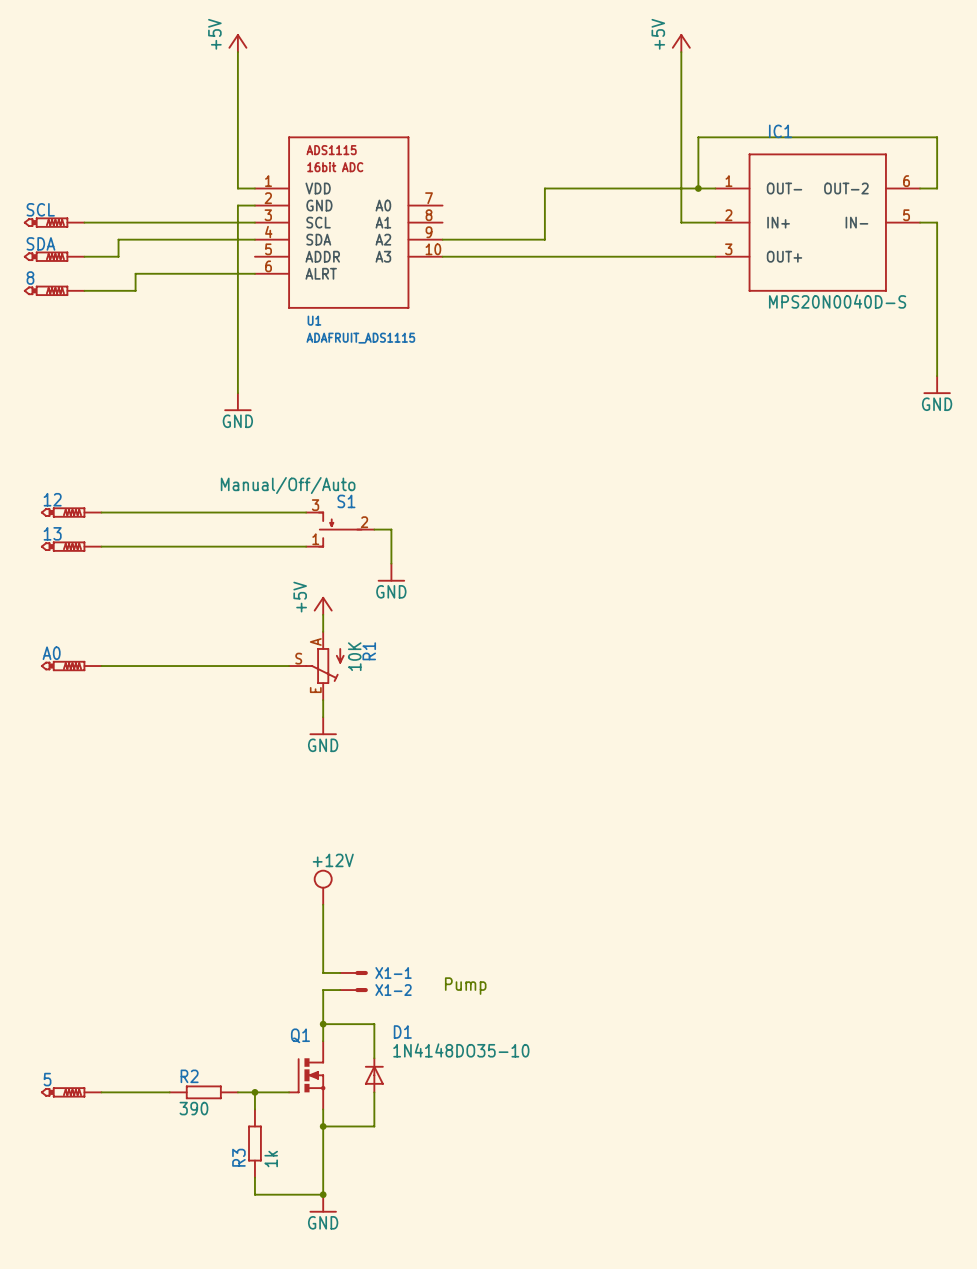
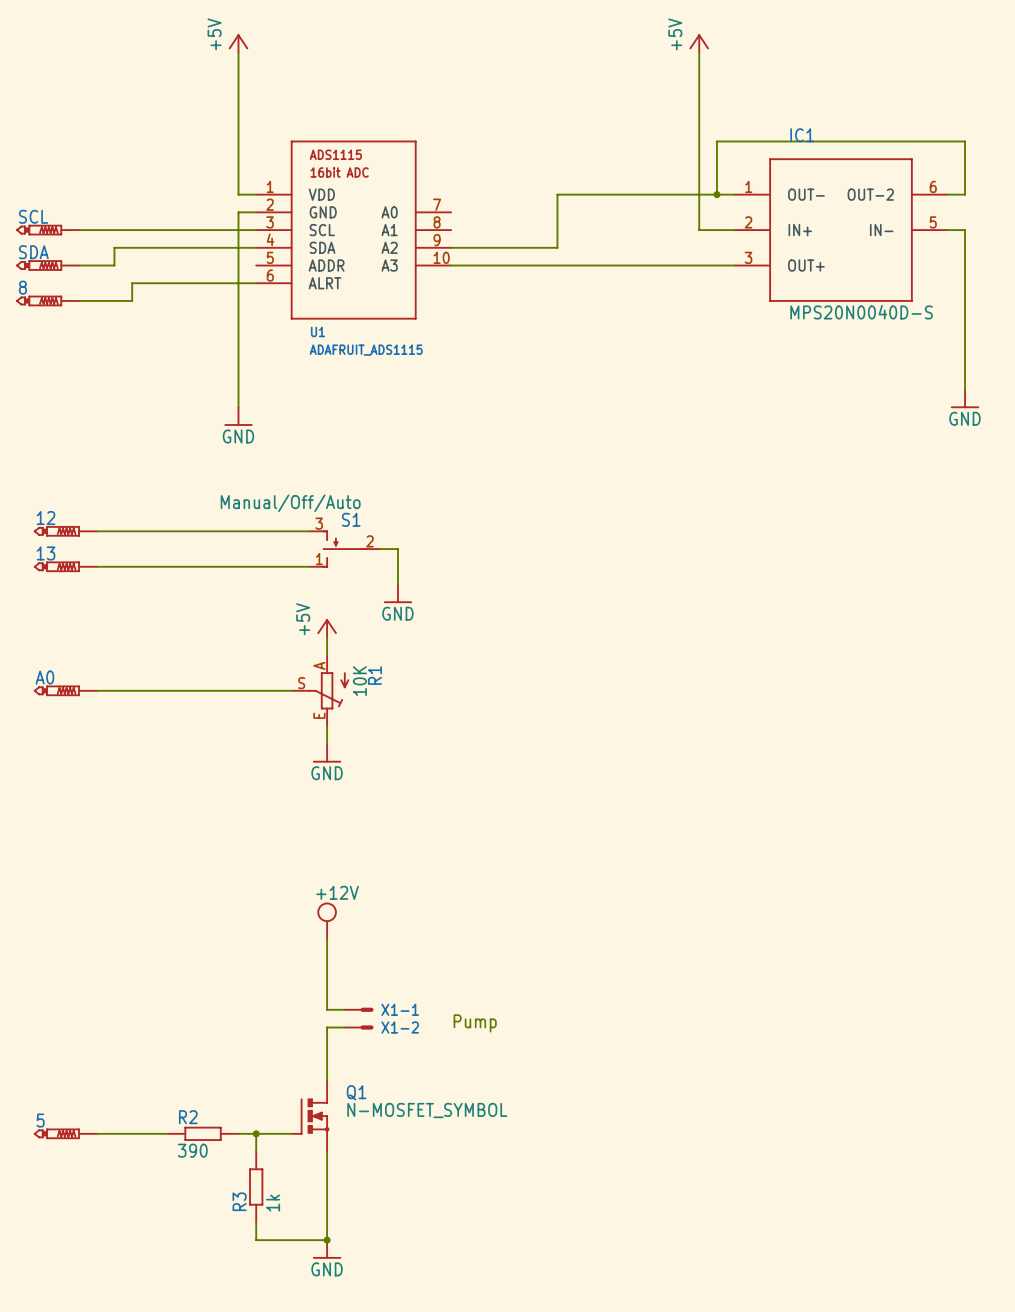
wire: (323, 1024) (374, 1024) (374, 1058) -> none
junction: (323, 1024) -> none
Q1 name position: Q1 (300, 1035) -> Q1 (356, 1092)
Q1 value: none -> N-MOSFET_SYMBOL (427, 1110)
D1: 1N4148DO35-10 (374, 1075) -> none
wire: (374, 1092) (374, 1126) (323, 1126) -> none
junction: (323, 1126) -> none

